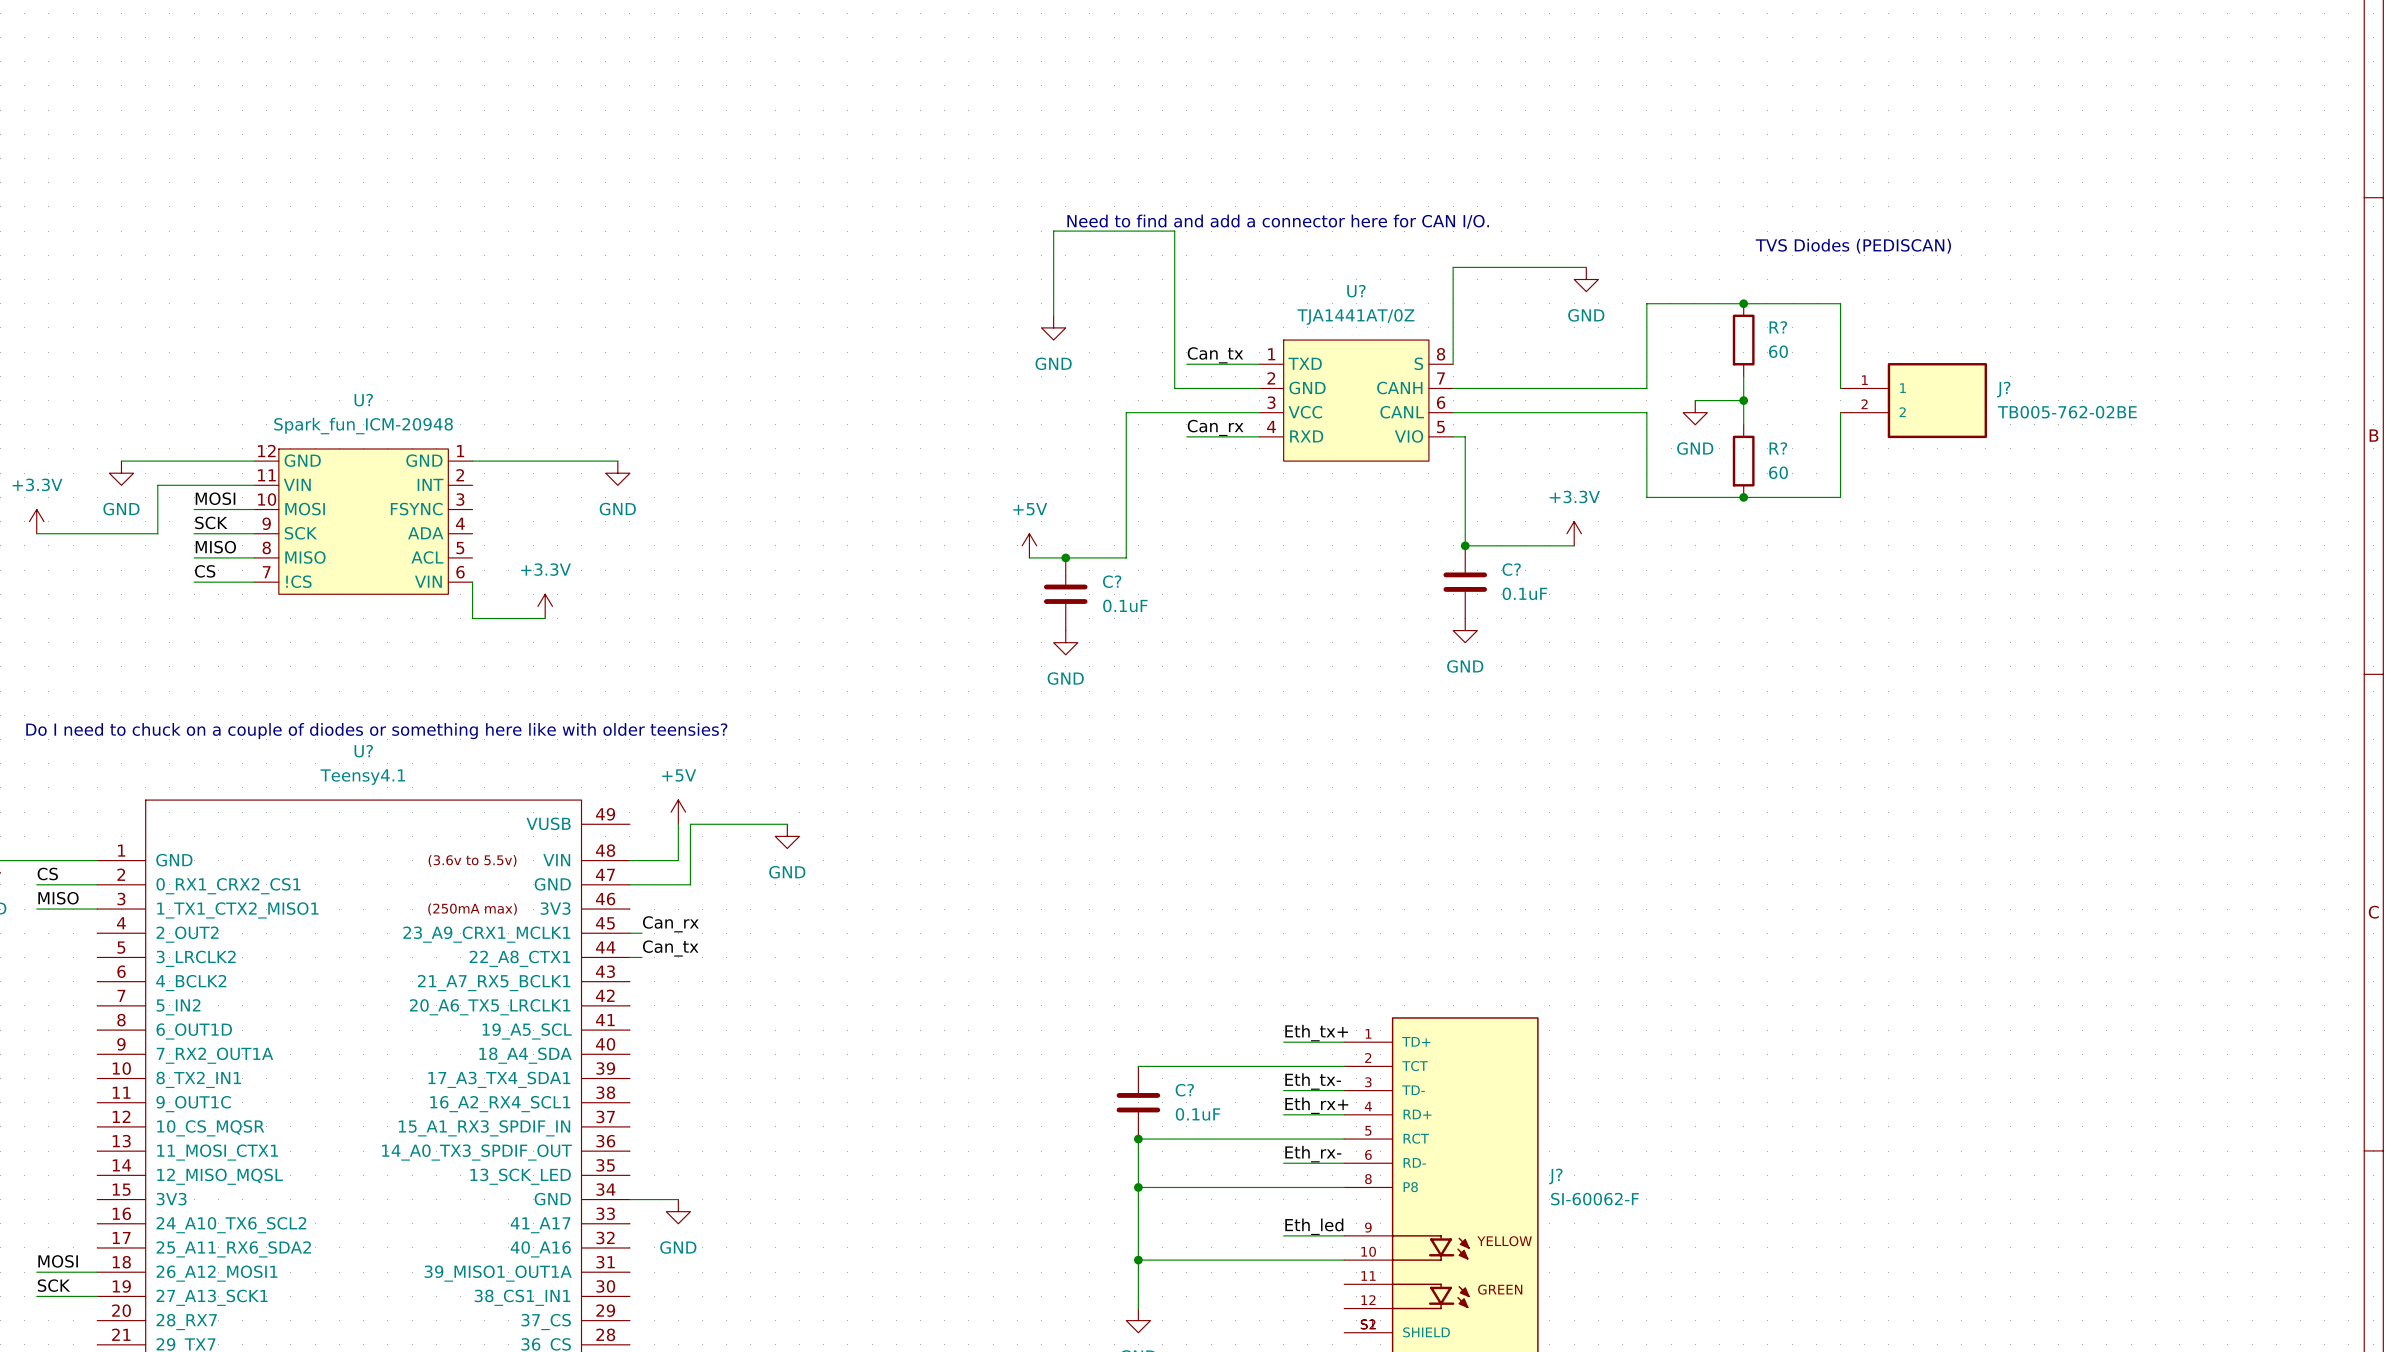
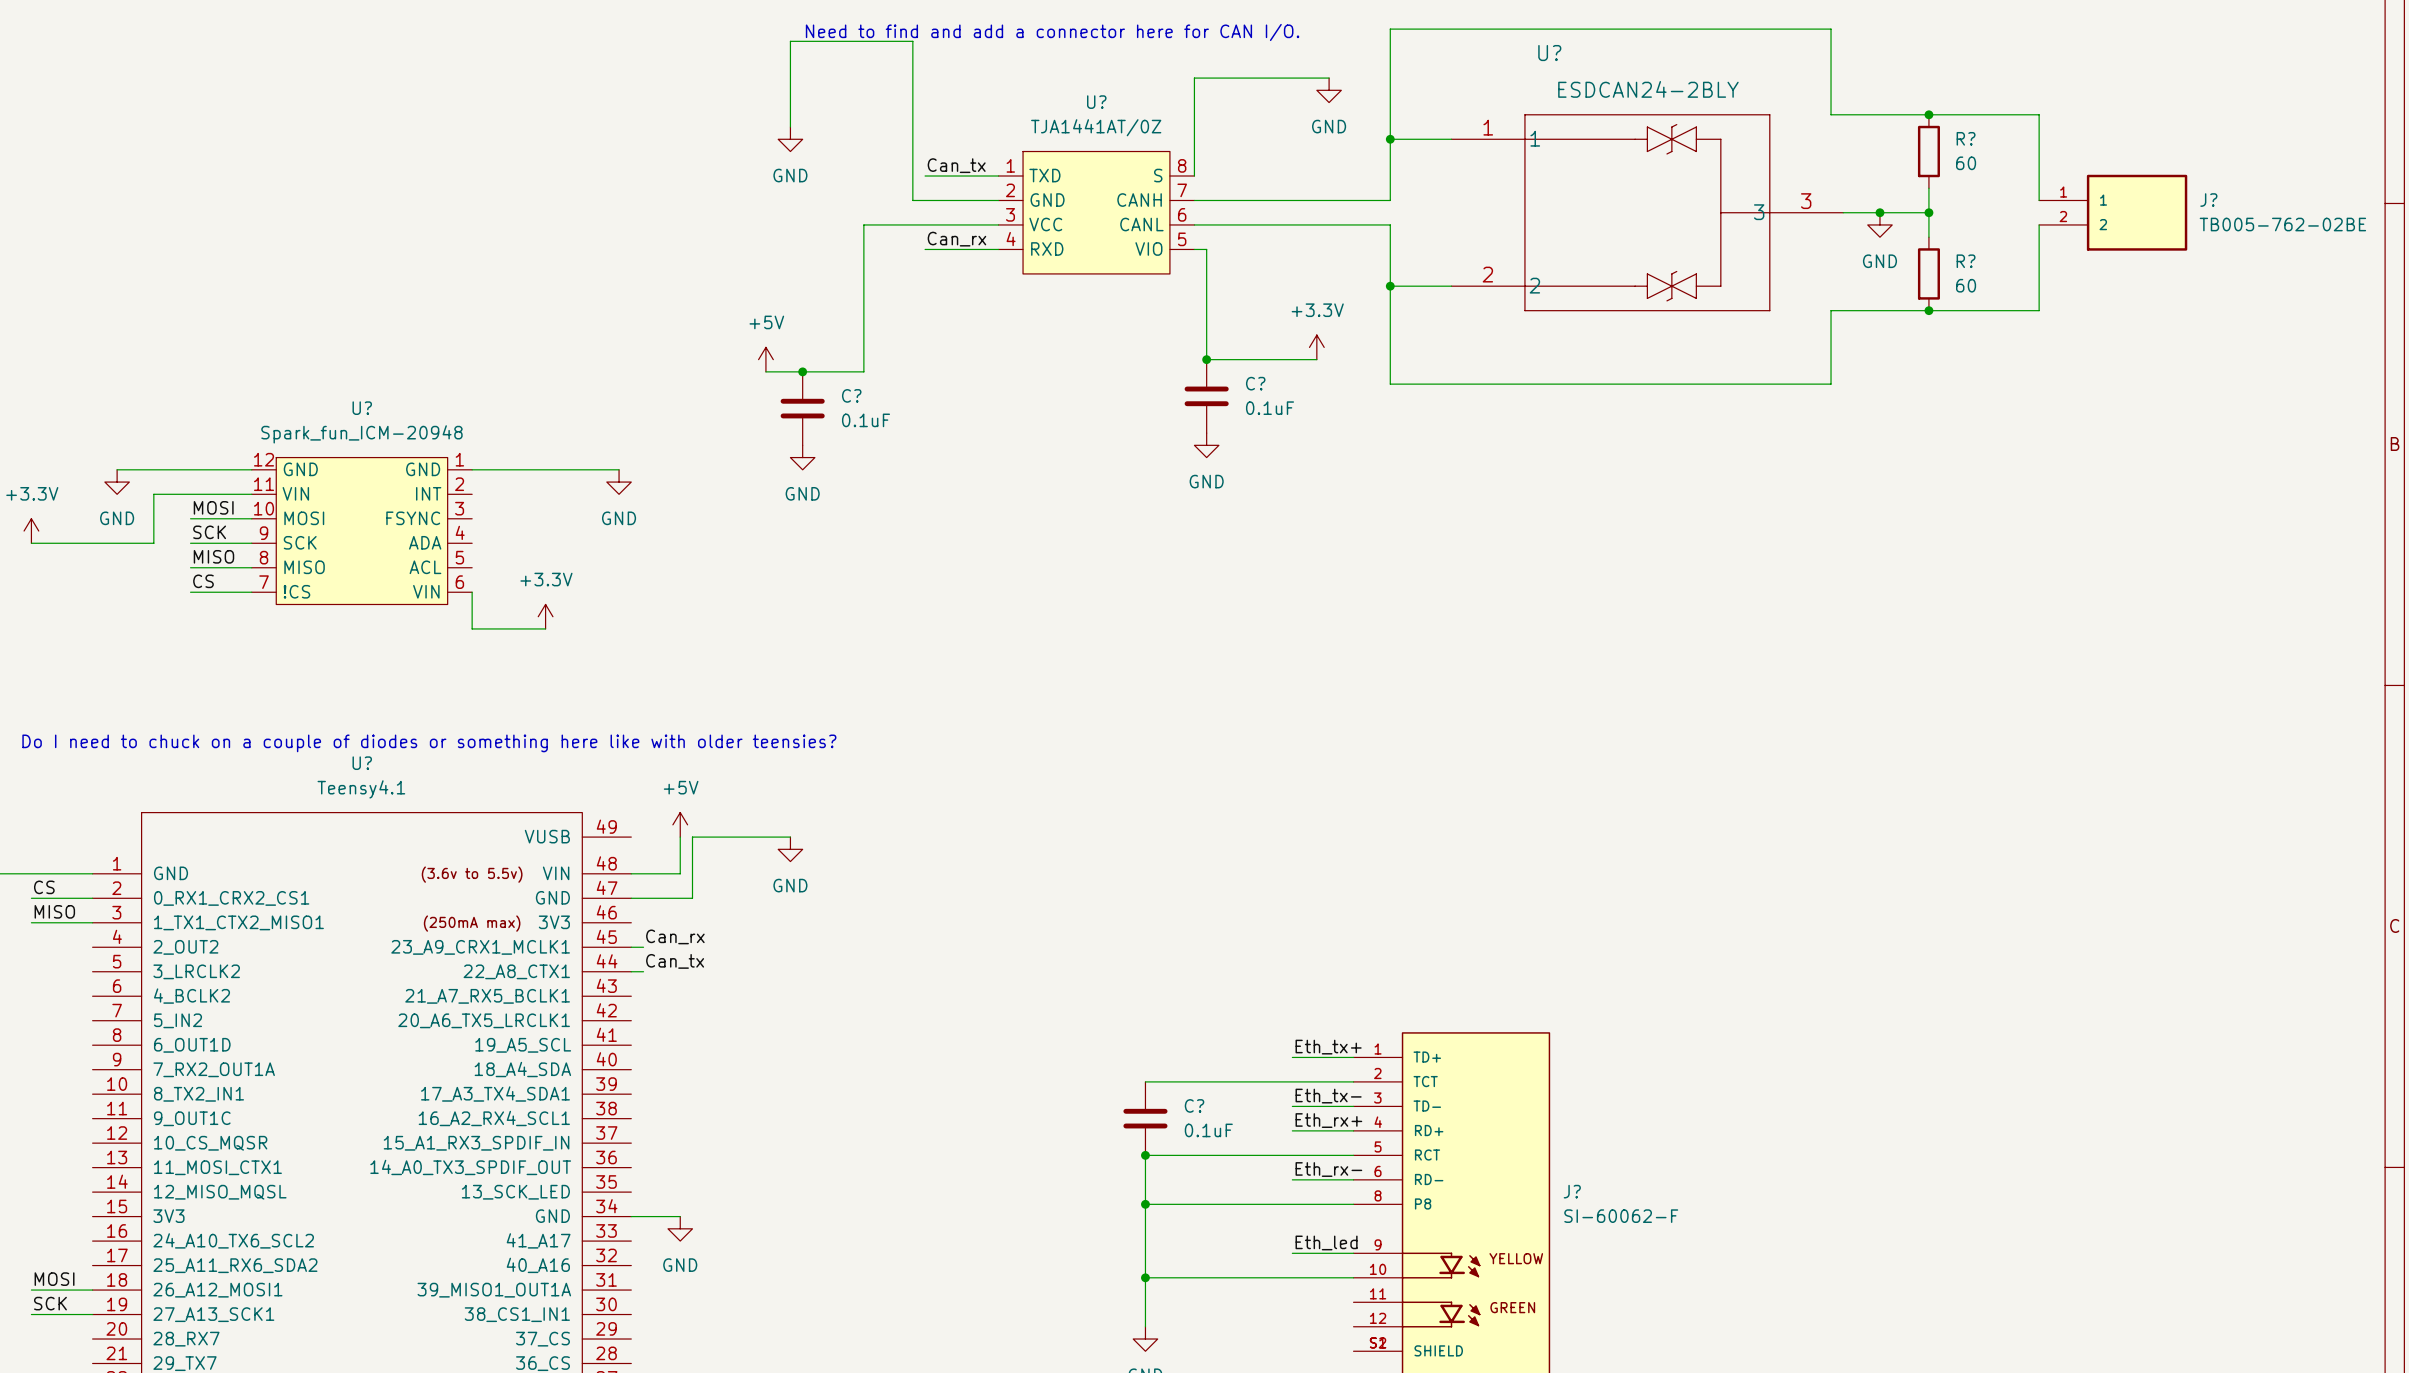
text: none -> Need to find and add a connector here for CAN I/O. (1052, 32)
wire: none -> (1329, 78) (1194, 78) (1194, 176)
power symbol: none -> GND (1329, 90)
junction: none -> (1928, 114)
wire: none -> (790, 127) (790, 41) (912, 41) (912, 200) (998, 200)
power symbol: none -> GND (790, 139)
wire: none -> (1390, 139) (1451, 139)
junction: none -> (1390, 139)
R?: none -> 60 (1928, 151)
label: none -> Can_tx (956, 165)
wire: none -> (925, 176) (998, 176)
wire: none -> (1928, 188) (1928, 237)
wire: none -> (1194, 200) (1390, 200) (1390, 29) (1831, 29) (1831, 114) (2039, 114) (2039, 200)
U?: none -> TJA1441AT/0Z (1096, 212)
U?: none -> ESDCAN24-2BLY (1647, 212)
wire: none -> (1843, 212) (1928, 212)
junction: none -> (1879, 212)
junction: none -> (1928, 212)
J?: none -> TB005-762-02BE (2113, 212)
wire: none -> (998, 224) (863, 224) (863, 371) (765, 371)
power symbol: none -> GND (1879, 224)
text: Need to find and add a connector here for CAN I/O. (1278, 221) -> none
label: none -> Can_rx (956, 239)
wire: none -> (925, 249) (998, 249)
wire: none -> (1194, 249) (1206, 249) (1206, 359) (1316, 359)
text: TVS Diodes (PEDISCAN) (1853, 246) -> none
wire: (1586, 267) (1453, 267) (1453, 364) -> none
R?: none -> 60 (1928, 273)
wire: none -> (1390, 286) (1451, 286)
junction: none -> (1390, 286)
power symbol: GND (1586, 279) -> none
junction: (1743, 303) -> none
wire: (1816, 303) (1646, 303) (1646, 388) (1453, 388) -> (1831, 310) (1831, 384) (1390, 384) (1390, 224) (1194, 224)
wire: (1840, 303) (1840, 388) -> (1855, 310) (2039, 310) (2039, 224)
junction: none -> (1928, 310)
wire: (1053, 315) (1053, 231) (1174, 231) (1174, 388) (1259, 388) -> none
power symbol: GND (1053, 327) -> none
power symbol: none -> +3.3V (1316, 347)
R?: 60 (1743, 340) -> none
power symbol: none -> +5V (765, 359)
junction: none -> (1206, 359)
label: Can_tx (1215, 355) -> none
junction: none -> (802, 371)
wire: (1186, 364) (1259, 364) -> none
wire: (1743, 376) (1743, 424) -> none
C?: none -> 0.1uF (1206, 396)
C?: none -> 0.1uF (802, 408)
U?: TJA1441AT/0Z (1356, 400) -> none
wire: (1695, 400) (1743, 400) -> none
junction: (1743, 400) -> none
J?: TB005-762-02BE (1913, 400) -> none
wire: (1259, 412) (1126, 412) (1126, 557) (1029, 557) -> none
wire: (1453, 412) (1646, 412) (1646, 497) (1840, 497) (1840, 412) -> none
power symbol: GND (1695, 412) -> none
label: Can_rx (1215, 427) -> none
wire: (1186, 436) (1259, 436) -> none
power symbol: none -> GND (1206, 445)
wire: (1453, 436) (1465, 436) (1465, 545) (1574, 545) -> none
power symbol: none -> GND (802, 457)
R?: 60 (1743, 461) -> none
junction: (1743, 497) -> none
power symbol: +3.3V (1574, 533) -> none
power symbol: +5V (1029, 545) -> none
junction: (1465, 545) -> none
junction: (1065, 557) -> none
C?: 0.1uF (1465, 582) -> none
C?: 0.1uF (1065, 594) -> none
power symbol: GND (1465, 630) -> none
power symbol: GND (1065, 642) -> none

